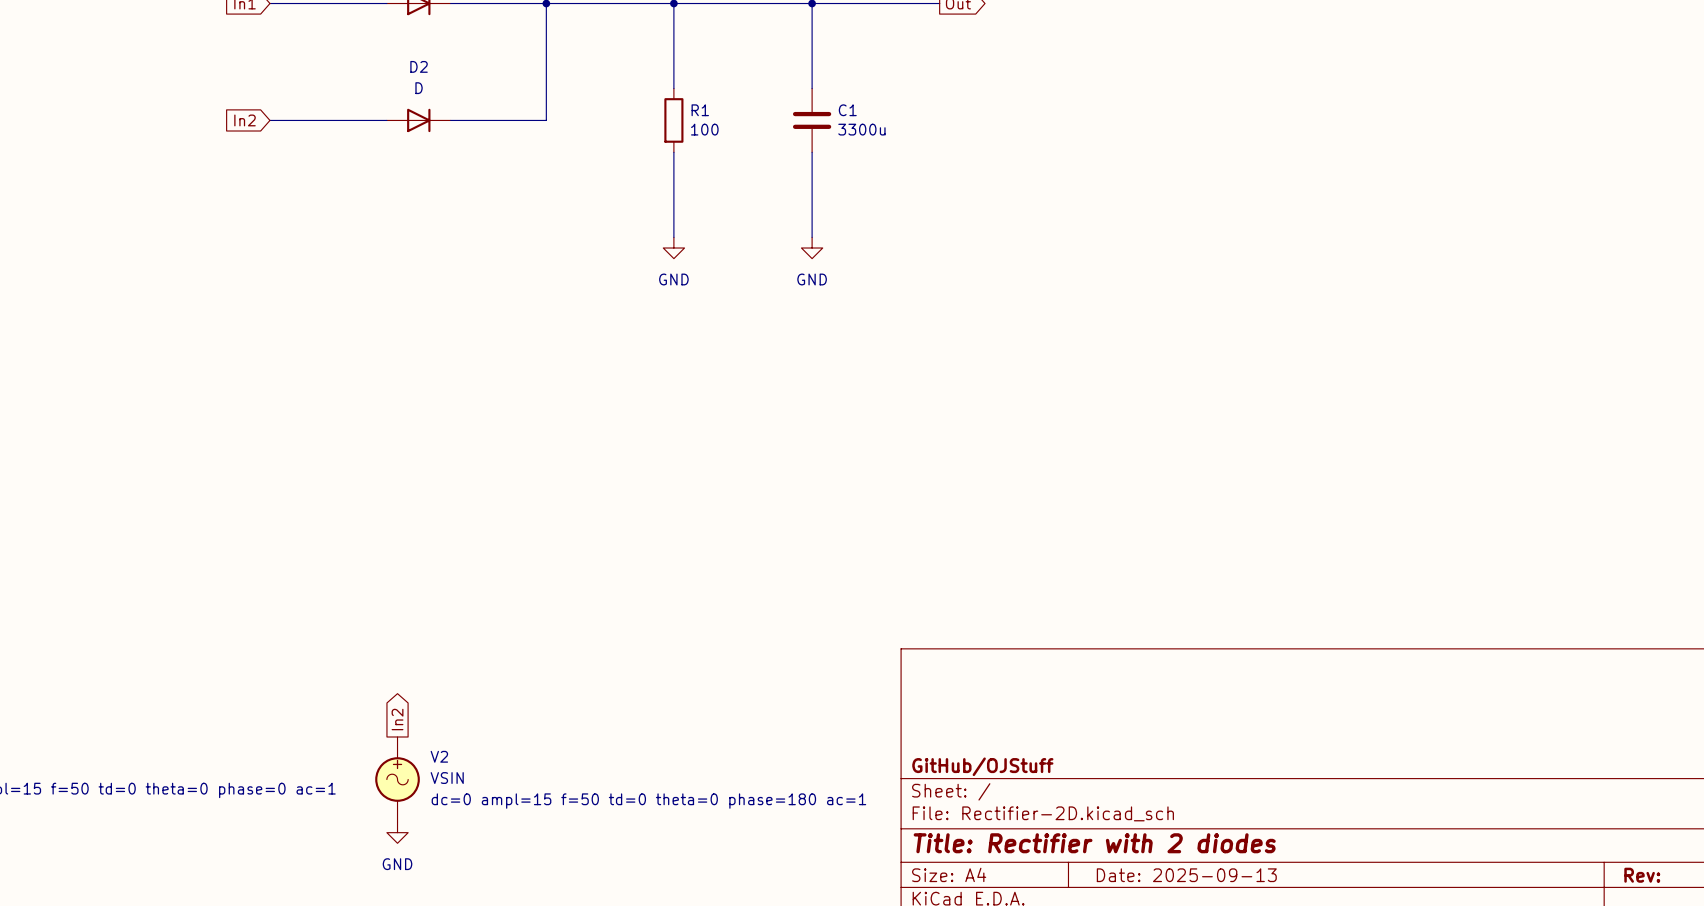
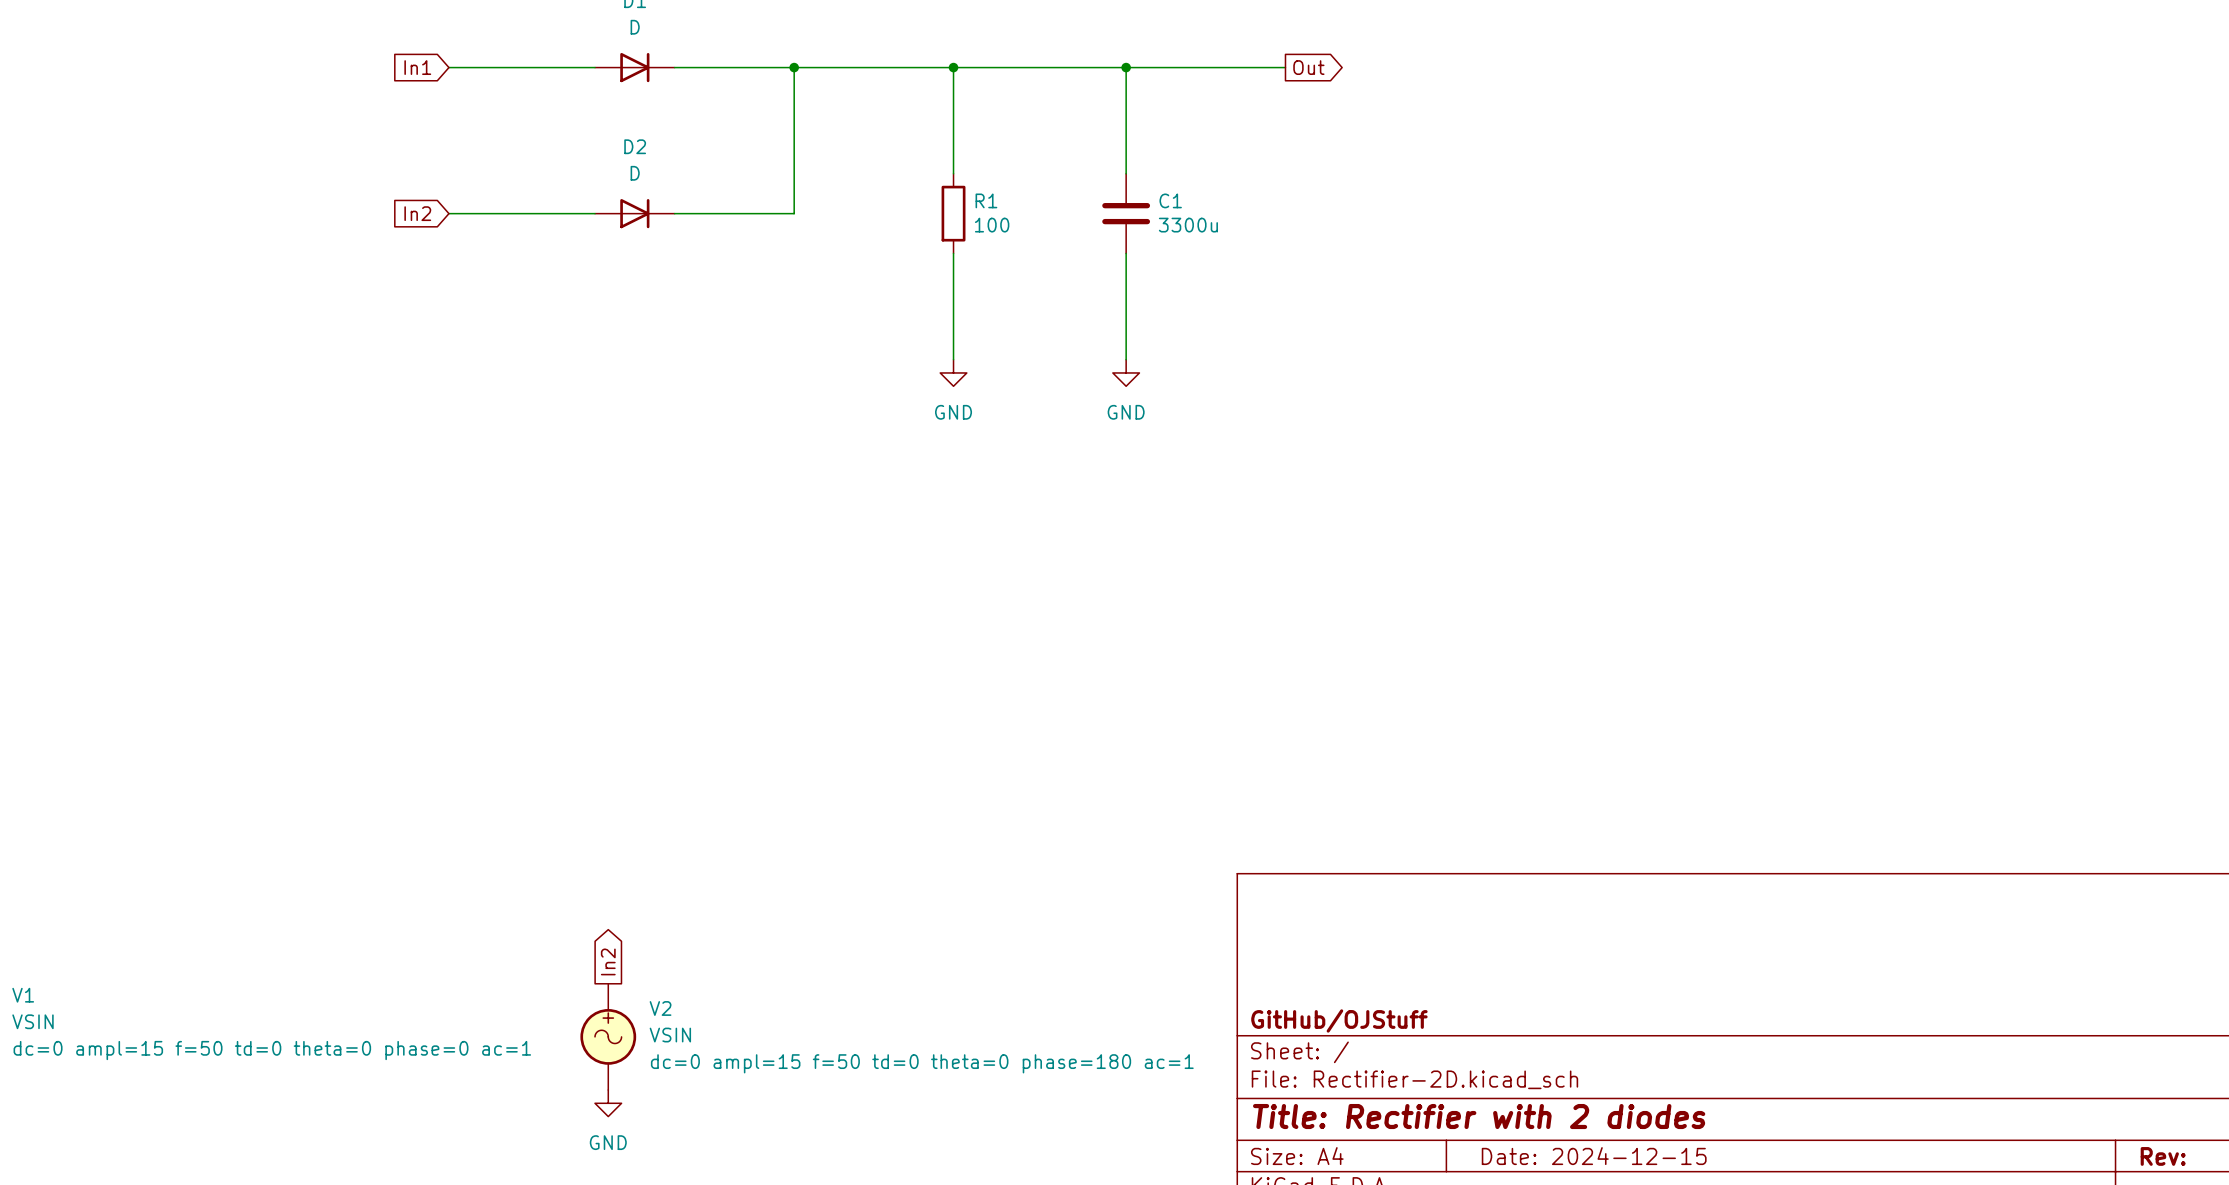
title block: Date: 2025-09-13 (1186, 875) -> Date: 2024-12-15 (1594, 1156)

